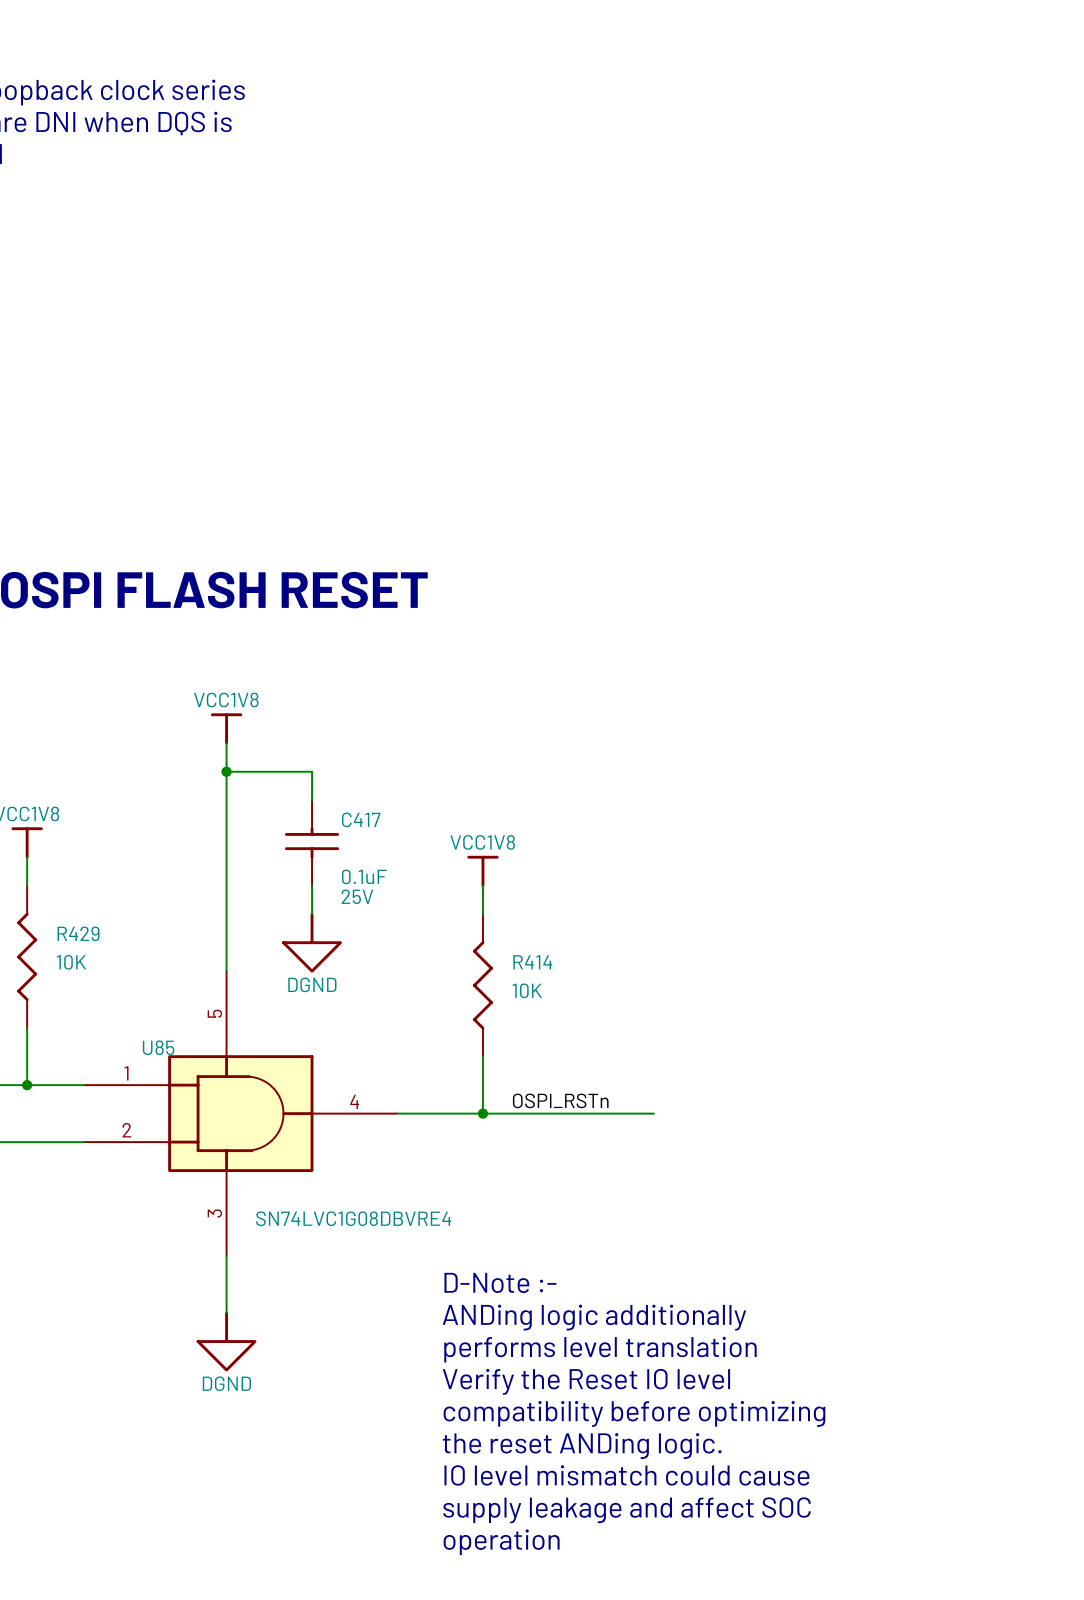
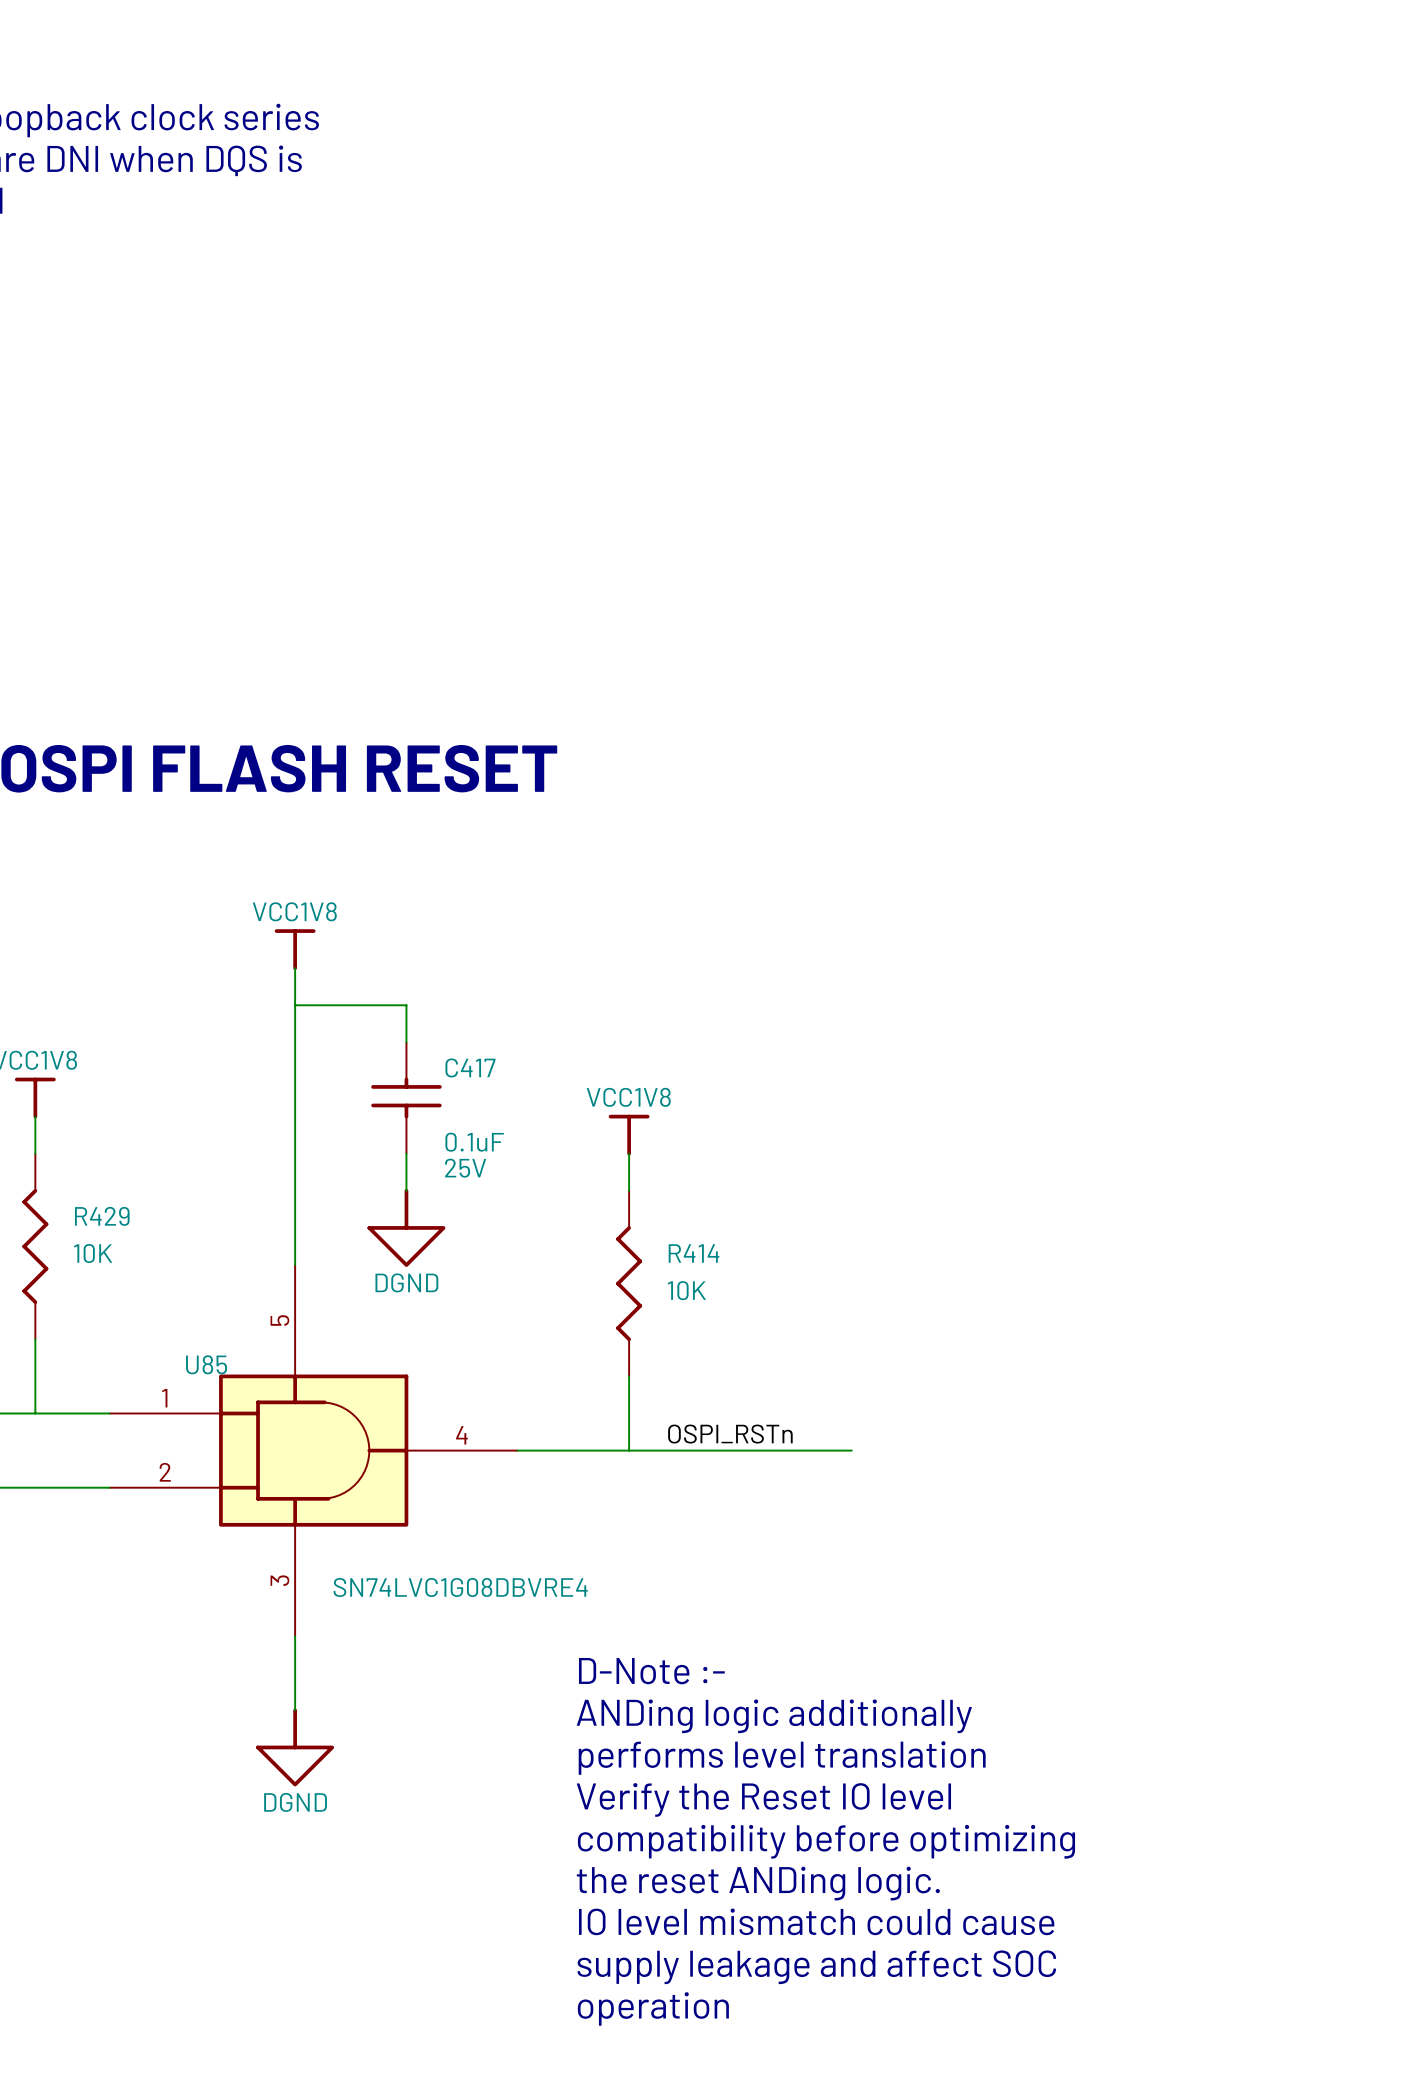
junction: (226, 771) -> none
junction: (27, 1085) -> none
junction: (482, 1113) -> none

